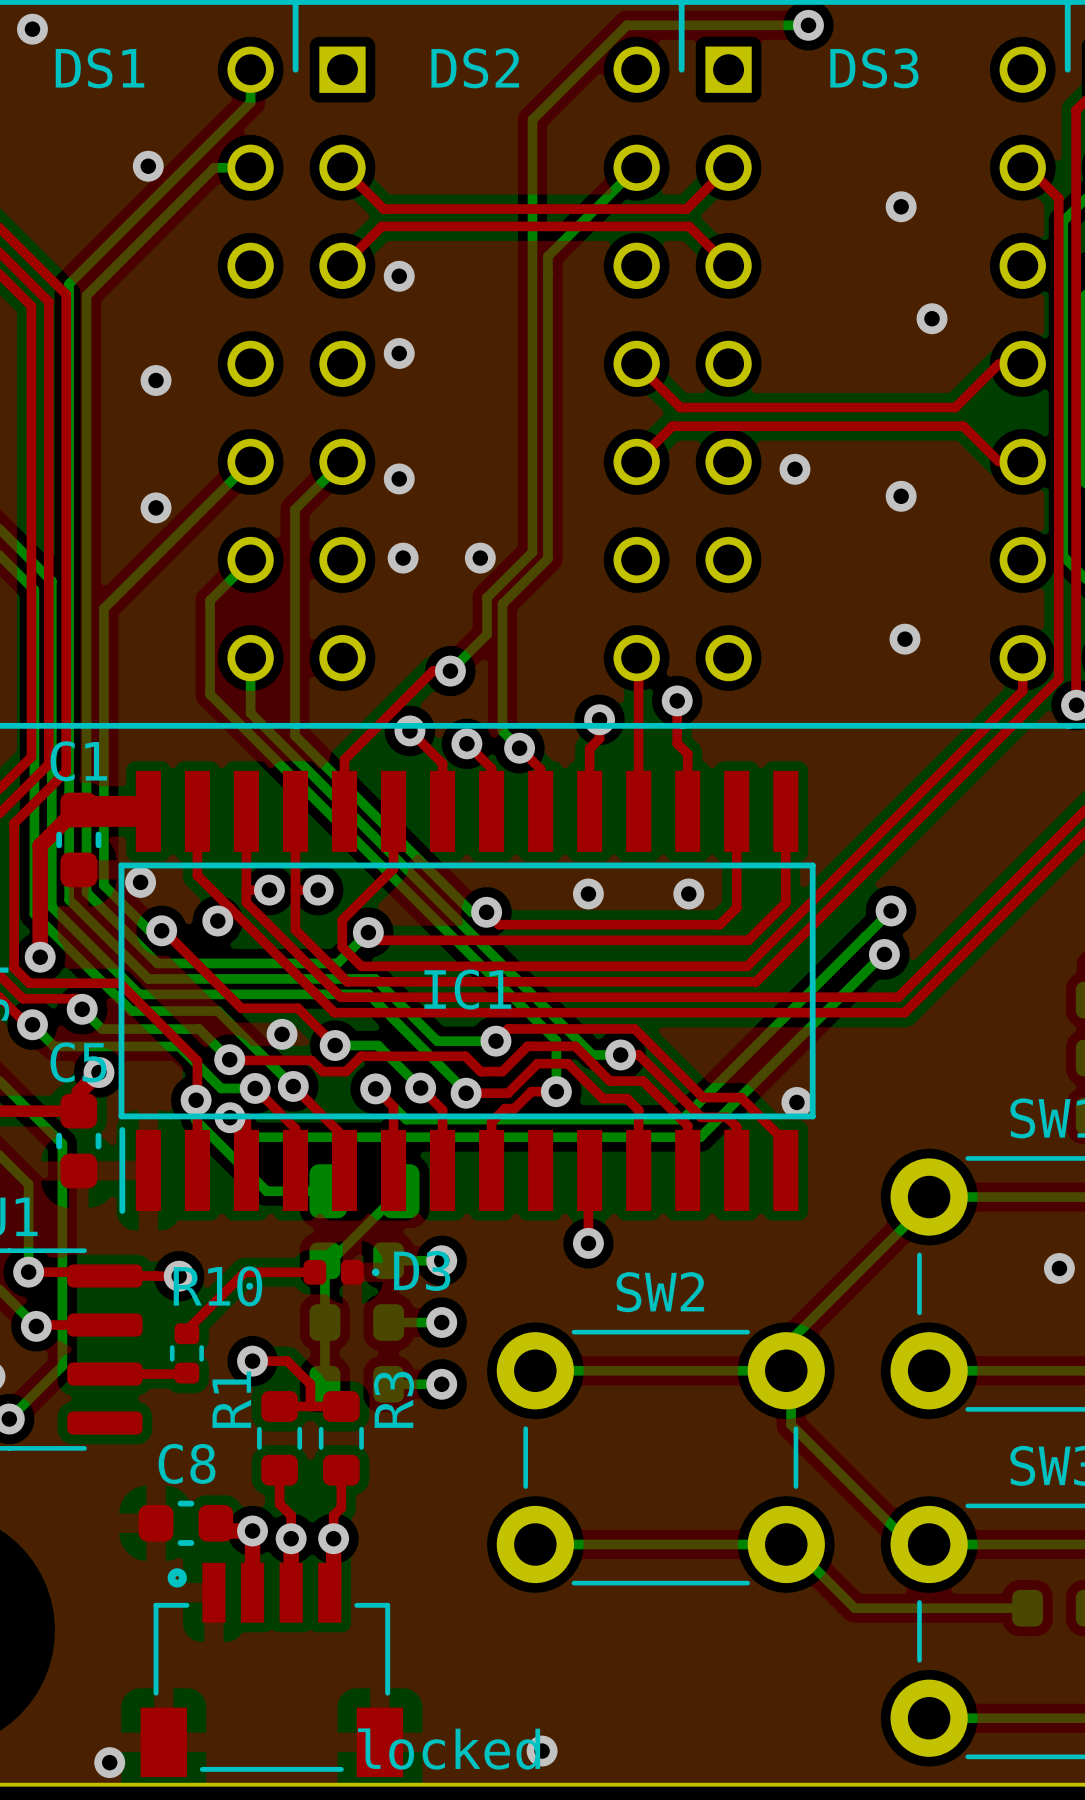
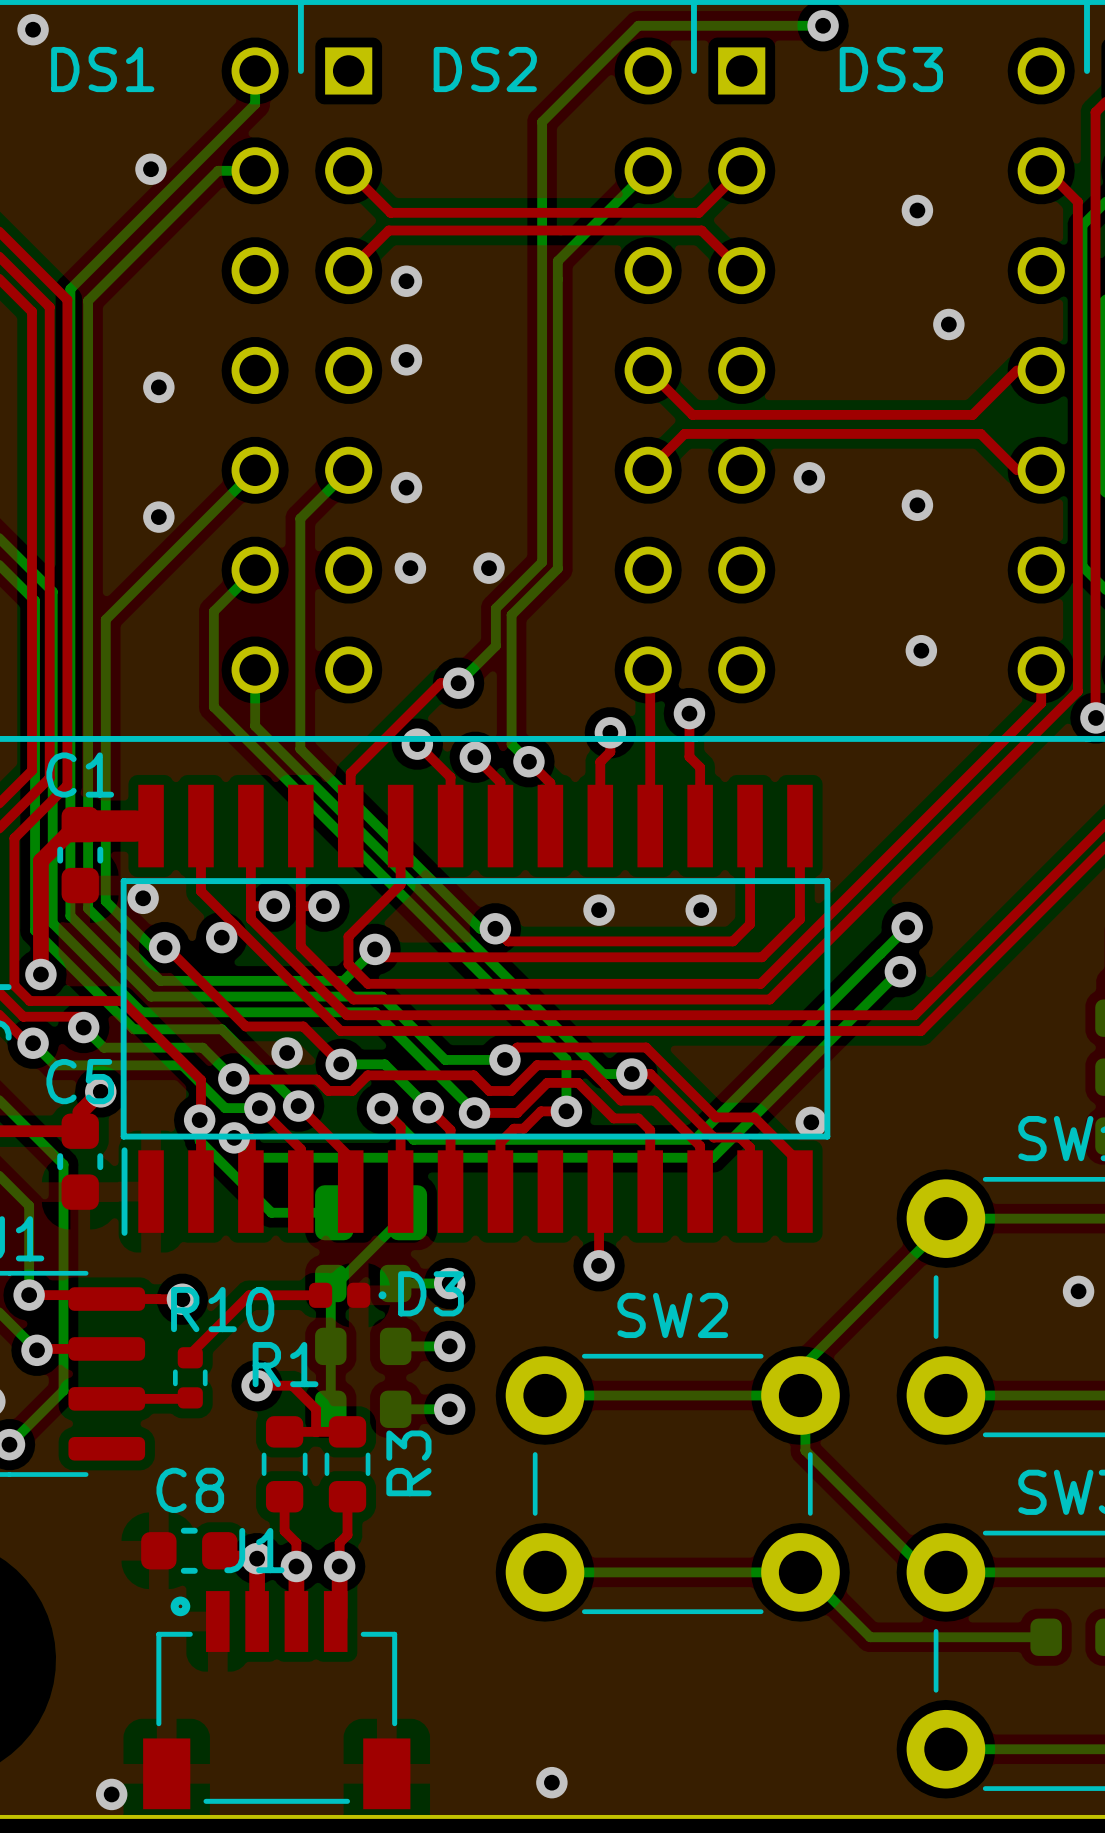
IC1 name: IC1 (467, 989) -> none
R1 name rotation: 0° (231, 1399) -> 90° clockwise (285, 1364)
R3 name position: R3 (393, 1399) -> R3 (408, 1463)
locked name: locked (449, 1749) -> J1 (254, 1550)

